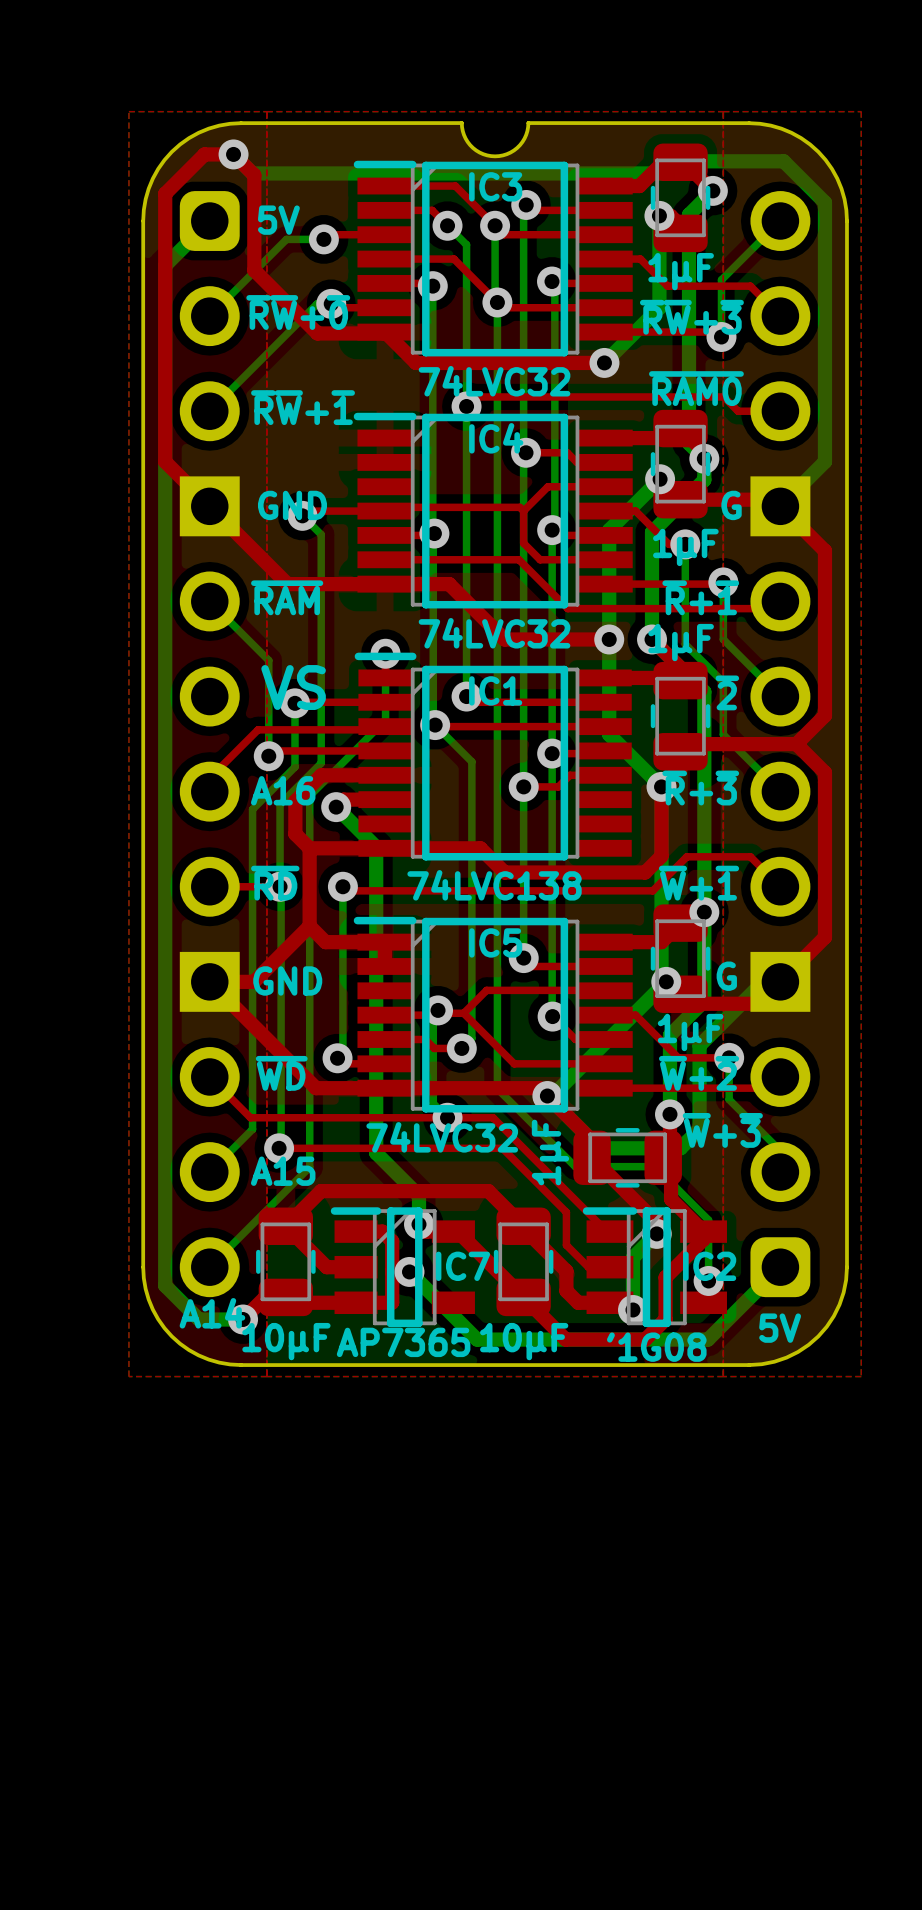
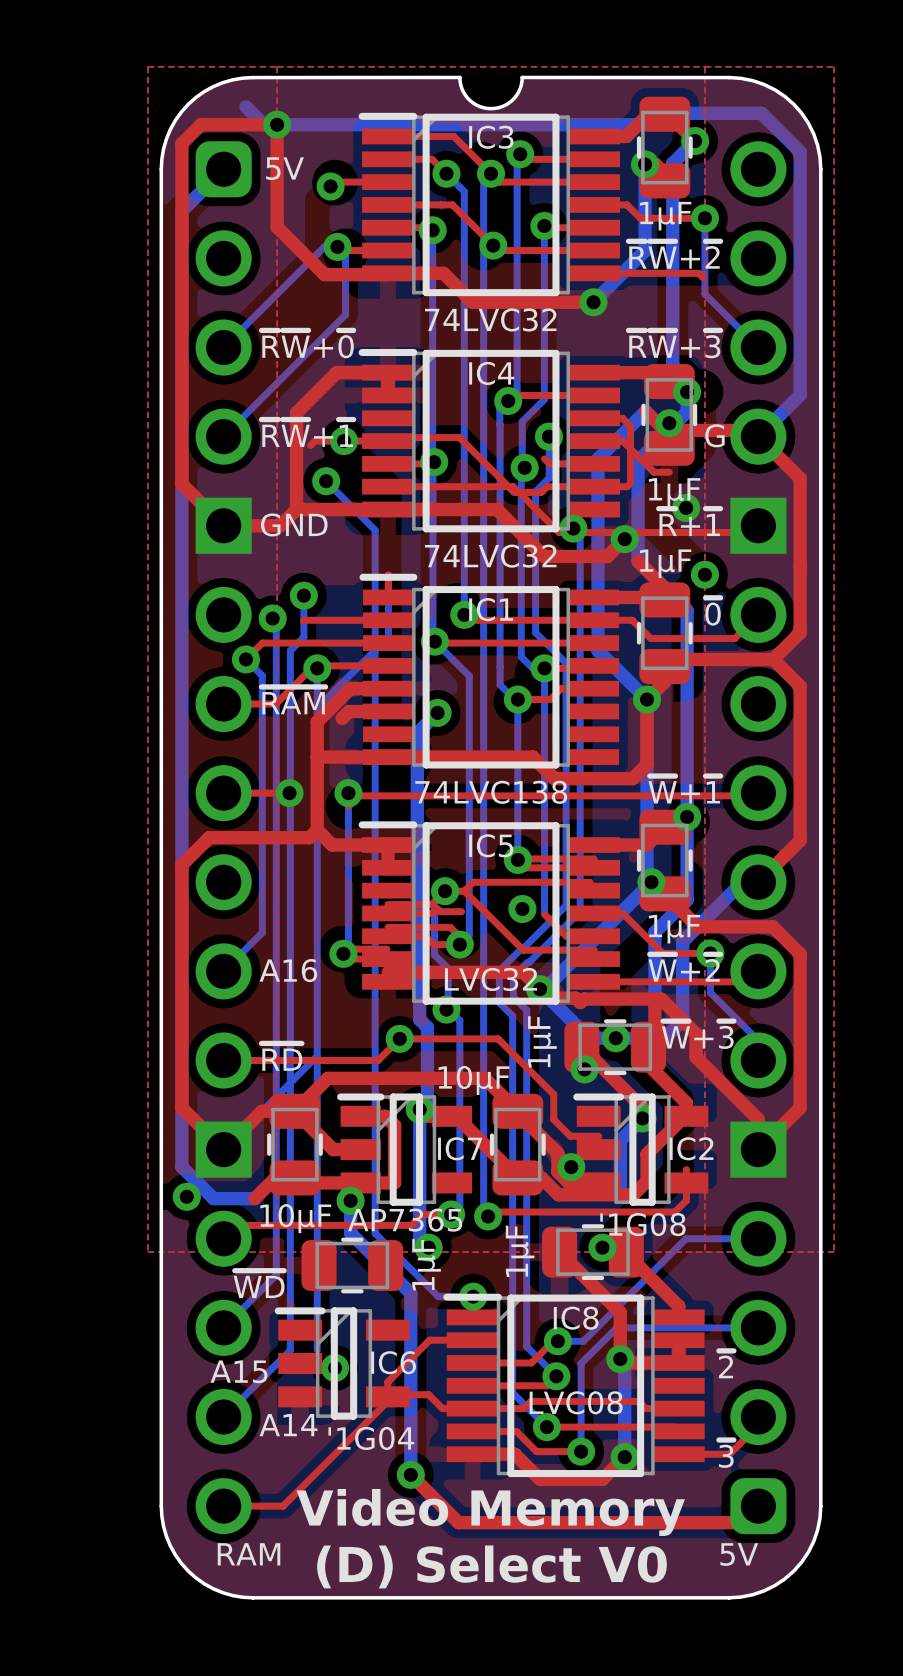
via position: (233, 154) -> (277, 124)
top track: (185, 173) (204, 154) (233, 154) (254, 175) (254, 270) (266, 282) -> (200, 124) (277, 124) (277, 227)
bottom track: (523, 207) (523, 450) (526, 452) (523, 455) (523, 790) -> (500, 424) (500, 684) (517, 702)
bottom track: none -> (517, 156) (517, 392) (499, 409) (499, 424)
bottom track: none -> (482, 164) (483, 166) (483, 1212) (488, 1216)
bottom track: (780, 221) (721, 279) (721, 336) -> none
bottom track: (495, 225) (495, 300) (497, 302) (497, 1088) (575, 1166) (655, 1166) (708, 1220) (708, 1280) -> none
bottom track: (323, 239) (286, 239) (209, 316) -> none
top track: (640, 259) (667, 286) (750, 286) (780, 316) -> (627, 204) (640, 218) (704, 218)
bottom track: none -> (704, 218) (704, 294) (758, 347)
bottom track: (552, 281) (554, 284) (552, 766) -> (544, 225) (544, 399) (522, 421) (522, 465) (524, 467) (521, 471) (521, 656) (544, 680)
bottom track: none -> (345, 251) (345, 314) (223, 436)
text: ~{R}~{W}+~{0} (298, 312) -> ~{R}~{W}+~{2} (674, 255)
text position: ~{R}~{W}+~{3} (691, 317) -> ~{R}~{W}+~{3} (674, 344)
top track: (385, 332) (415, 362) (475, 362) -> (387, 273) (443, 273) (472, 302)
via position: (721, 336) -> (704, 218)
text: ~{RAM0} (696, 388) -> none
top track: (466, 406) (466, 396) (723, 396) (738, 411) (780, 411) -> none
via: (466, 406) -> none
text: ~{R}~{W}+~{1} (303, 407) -> ~{R}~{W}+~{0} (307, 344)
top track: (526, 452) (567, 452) (576, 462) -> (508, 400) (513, 395) (567, 395)
via position: (526, 452) -> (508, 400)
top track: (165, 461) (287, 584) -> (181, 394) (181, 484) (223, 525) (280, 525) (296, 509) (296, 412) (336, 372) (387, 372) (387, 395)
part position: (680, 464) -> (669, 414)
via position: (660, 479) -> (669, 423)
top track: (605, 486) (547, 486) (523, 511) -> (594, 418) (622, 418) (630, 426) (630, 483) (627, 486) (594, 486)
text: GND (292, 505) -> ~{R}~{W}+~{1} (307, 433)
via: none -> (548, 436)
bottom track: none -> (549, 436) (549, 478) (535, 491) (535, 632) (566, 663) (566, 905) (499, 970) (499, 1002) (512, 1016) (512, 1392) (546, 1427)
top track: (461, 507) (519, 507) (523, 511) -> (459, 437) (514, 492) (541, 492) (547, 486)
via: none -> (343, 441)
top track: (523, 511) (523, 543) (540, 559) (554, 559) -> none
bottom track: (302, 515) (321, 534) (321, 763) (280, 804) (281, 1146) (279, 1148) -> none
via: (302, 515) -> none
via: (552, 530) -> none
via: none -> (524, 467)
bottom track: (685, 544) (685, 644) (723, 682) (723, 734) (780, 791) -> none
via: (685, 544) -> none
bottom track: none -> (326, 481) (375, 530) (375, 1233) (438, 1296) (473, 1296)
via: none -> (326, 481)
top track: (723, 582) (721, 584) (605, 584) -> none
bottom track: (723, 582) (723, 639) (780, 696) -> none
via position: (723, 582) -> (686, 507)
top track: (449, 584) (504, 639) (609, 639) -> (448, 509) (497, 509) (544, 556) (607, 556) (624, 539)
text: ~{RAM} (287, 597) -> GND (294, 524)
bottom track: (209, 601) (268, 660) (268, 756) -> none
bottom track: none -> (573, 528) (580, 535) (580, 911) (513, 976) (513, 997) (526, 1010) (526, 1346) (556, 1376)
via: none -> (573, 528)
via: none -> (624, 539)
via: (609, 639) -> none
via: (652, 639) -> none
via: (385, 653) -> none
via: none -> (704, 574)
bottom track: none -> (303, 595) (303, 637) (290, 650) (290, 1350) (223, 1417)
text: VS (293, 687) -> none
text: ~{2} (727, 692) -> ~{0} (713, 611)
top track: none -> (758, 614) (734, 638) (650, 638) (632, 620) (593, 620)
bottom track: none -> (272, 618) (276, 622) (276, 1275) (223, 1327)
via: none -> (272, 618)
bottom track: (294, 703) (294, 767) (252, 809) (252, 1129) (209, 1172) -> none
via position: (294, 703) -> (303, 595)
top track: none -> (388, 643) (262, 643) (245, 659)
top track: (382, 729) (258, 729) (209, 778) -> none
bottom track: none -> (245, 659) (262, 675) (262, 932) (223, 971)
via: none -> (245, 659)
part: (495, 744) -> none
top track: (306, 750) (274, 750) (268, 756) -> (314, 665) (275, 704) (223, 704)
via: none -> (317, 668)
via: (268, 756) -> none
top track: (345, 775) (321, 775) (295, 801) (295, 834) (309, 848) -> (350, 688) (317, 721) (317, 757)
text: ~{R}+~{3} (700, 788) -> none
text: A16 (283, 790) -> ~{RAM} (293, 700)
bottom track: none -> (437, 712) (417, 733) (417, 961) (419, 964) (419, 1019) (427, 1027) (427, 1101) (419, 1109) (419, 1238) (428, 1247)
via: none -> (437, 712)
bottom track: (336, 807) (376, 847) (376, 1153) (419, 1195) (419, 1224) -> none
via: (336, 807) -> none
top track: (480, 848) (504, 872) (646, 871) -> (477, 757) (532, 757) (554, 778) (632, 778)
text: ~{RD} (275, 883) -> none
top track: (342, 886) (347, 890) (652, 890) (686, 856) (750, 856) (780, 886) -> none
top track: none -> (755, 795) (359, 795) (348, 806)
top track: (301, 934) (253, 981) (209, 981) (316, 1088) (539, 1088) (592, 1140) -> (309, 837) (209, 837) (181, 864) (181, 1107) (223, 1149) (262, 1111) (294, 1111)
part: none -> (491, 837)
top track: none -> (517, 857) (594, 858)
text: G (726, 976) -> none
text: GND (287, 980) -> none
top track: none -> (590, 882) (473, 882) (464, 891)
top track: (604, 990) (486, 990) (463, 1013) (514, 1063) (605, 1063) -> none
bottom track: none -> (445, 891) (434, 901) (434, 954) (448, 968) (448, 1008) (459, 1020) (459, 1205) (451, 1214)
top track: none -> (464, 891) (445, 891) (431, 904) (387, 904)
top track: none -> (464, 891) (523, 950) (594, 950)
top track: none -> (664, 893) (697, 926) (772, 926) (800, 954) (800, 1107) (758, 1149) (758, 1119) (696, 1057) (696, 1033) (661, 999) (583, 999) (580, 1002) (575, 998) (549, 998) (523, 972) (388, 972)
top track: (690, 1003) (758, 1003) -> none
bottom track: (438, 1010) (433, 1015) (433, 1103) (447, 1117) -> none
via position: (438, 1010) -> (445, 891)
via position: (552, 1016) -> (522, 908)
top track: none -> (387, 927) (450, 927) (459, 936)
top track: none -> (341, 949) (386, 949)
text position: ~{WD} (281, 1073) -> ~{WD} (259, 1284)
top track: (209, 1076) (250, 1117) (493, 1117) (606, 1231) -> none
text: none -> A16 (288, 970)
IC5 text: none -> LVC32 (491, 979)
via: (669, 1114) -> none
text position: ~{W}+~{3} (722, 1130) -> ~{W}+~{3} (697, 1035)
IC5 text: 74LVC32 (442, 1137) -> none
top track: (279, 1148) (502, 1148) (566, 1212) (566, 1245) (588, 1267) (609, 1267) -> none
via: (279, 1148) -> none
via: none -> (615, 1038)
via: none -> (399, 1038)
top track: (671, 1165) (671, 1199) (703, 1231) (703, 1239) (665, 1277) (665, 1319) (645, 1339) (565, 1339) (523, 1297) -> (647, 1045) (647, 1063) (686, 1102) (686, 1114) (647, 1154) (647, 1181) (633, 1194) (558, 1194) (541, 1177) (517, 1177)
text: A15 (283, 1171) -> ~{RD} (281, 1057)
top track: none -> (223, 1060) (378, 1060) (399, 1038) (498, 1038) (553, 1094) (553, 1119) (570, 1136) (598, 1136)
via: none -> (584, 1069)
bottom track: (780, 1267) (708, 1339) (477, 1339) (409, 1271) -> none
via: (409, 1271) -> none
via: (708, 1280) -> none
via: none -> (571, 1167)
top track: none -> (686, 1182) (686, 1200) (674, 1212) (492, 1212) (488, 1216)
via: (632, 1309) -> none
text position: A14 (212, 1313) -> A14 (288, 1425)
via: none -> (186, 1196)
via: (243, 1319) -> none
bottom track: none -> (350, 1200) (350, 1233) (410, 1293) (410, 1474)
via: none -> (350, 1200)
text position: 5V (780, 1328) -> 5V (739, 1554)
top track: none -> (451, 1214) (422, 1214) (411, 1225) (237, 1225)
via: none -> (451, 1214)
via: none -> (488, 1216)
part value position: 10µF (524, 1341) -> 10µF (474, 1080)
bottom track: none -> (758, 1238) (686, 1238) (583, 1341) (557, 1341)
via: none -> (428, 1247)
via: none -> (602, 1247)
top track: none -> (559, 1252) (620, 1312) (620, 1359) (624, 1363) (678, 1363) (678, 1340)
part: none -> 1μF (592, 1252)
top track: none -> (626, 1253) (678, 1306) (678, 1317)
part: none -> 1μF (352, 1265)
via: none -> (473, 1296)
bottom track: none -> (758, 1327) (616, 1327) (581, 1363) (581, 1451)
top track: none -> (472, 1340) (429, 1340) (387, 1382) (387, 1396)
top track: none -> (557, 1341) (553, 1341) (531, 1363) (472, 1363)
via: none -> (557, 1341)
bottom track: none -> (620, 1359) (624, 1363) (624, 1457)
via: none -> (620, 1359)
IC6: none -> (342, 1363)
text: none -> ~{2} (726, 1364)
via: none -> (335, 1367)
text: none -> A15 (238, 1371)
top track: none -> (556, 1376) (546, 1385) (472, 1385)
via: none -> (556, 1376)
IC8: none -> (573, 1385)
top track: none -> (389, 1394) (428, 1394) (442, 1408) (523, 1408) (531, 1401) (638, 1401) (645, 1408) (678, 1408)
top track: none -> (387, 1401) (283, 1506) (223, 1506)
top track: none -> (758, 1425) (729, 1454) (678, 1454)
top track: none -> (546, 1427) (674, 1427)
via: none -> (546, 1427)
top track: none -> (472, 1431) (516, 1431) (536, 1451) (581, 1451)
via: none -> (581, 1451)
text: none -> ~{3} (726, 1453)
top track: none -> (472, 1454) (514, 1454) (540, 1479) (602, 1479) (624, 1457)
via: none -> (624, 1457)
top track: none -> (410, 1474) (458, 1522) (741, 1522)
via: none -> (410, 1474)
text: none -> Video Memory (490, 1512)
text: none -> RAM (249, 1554)
text: none -> (D) Select V0 (491, 1566)

